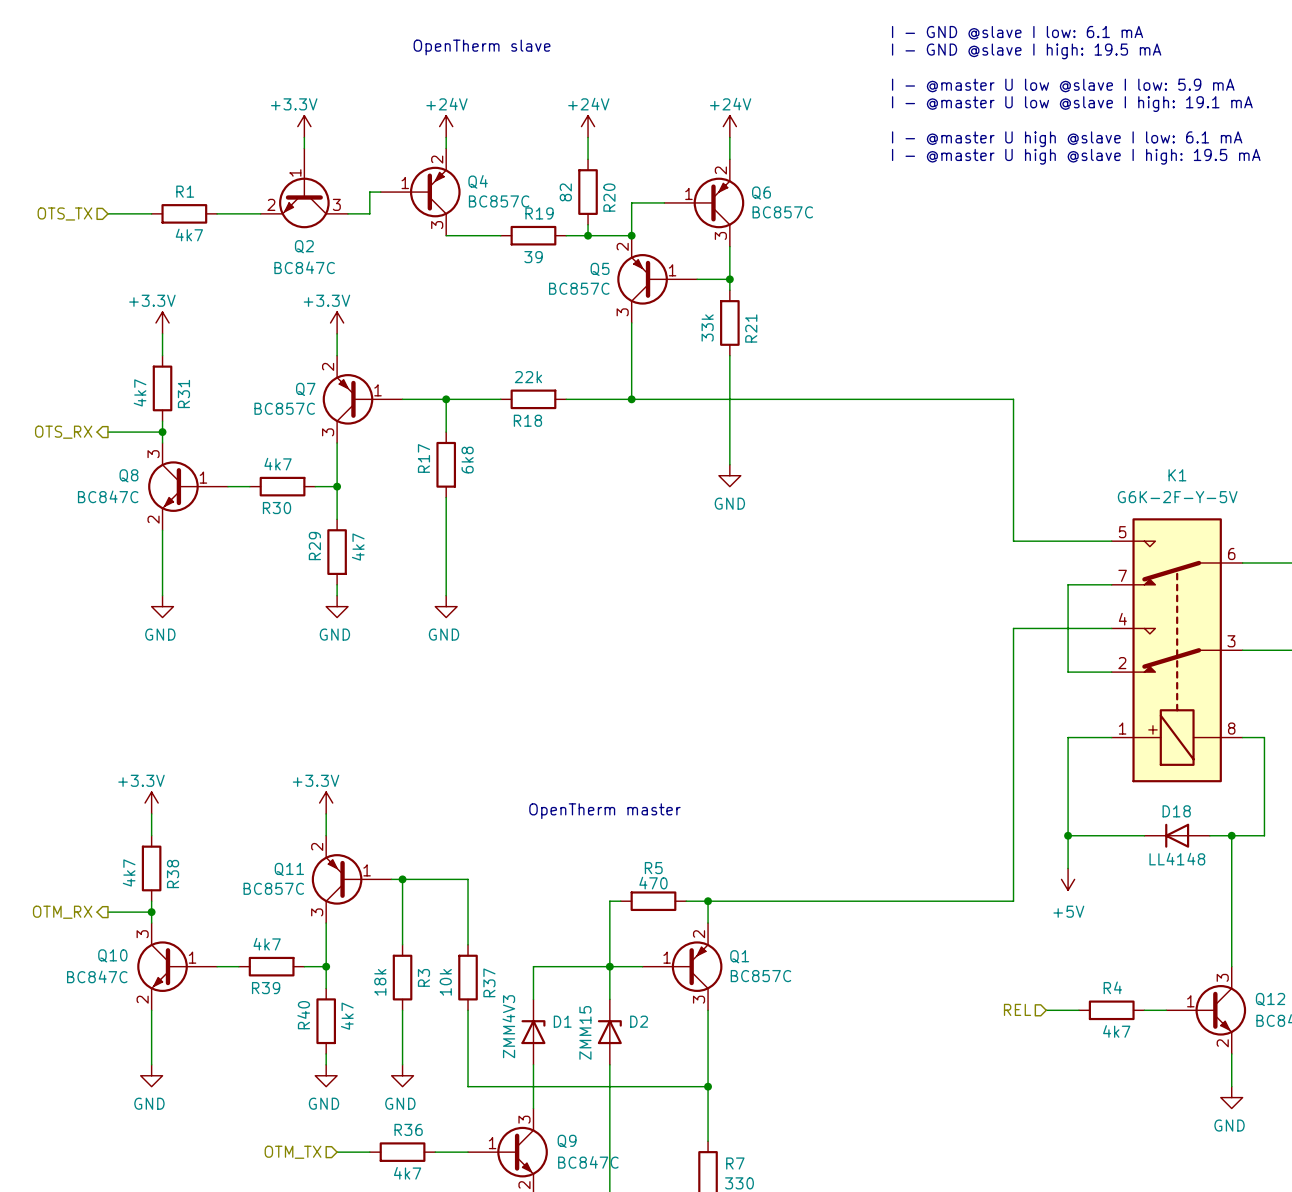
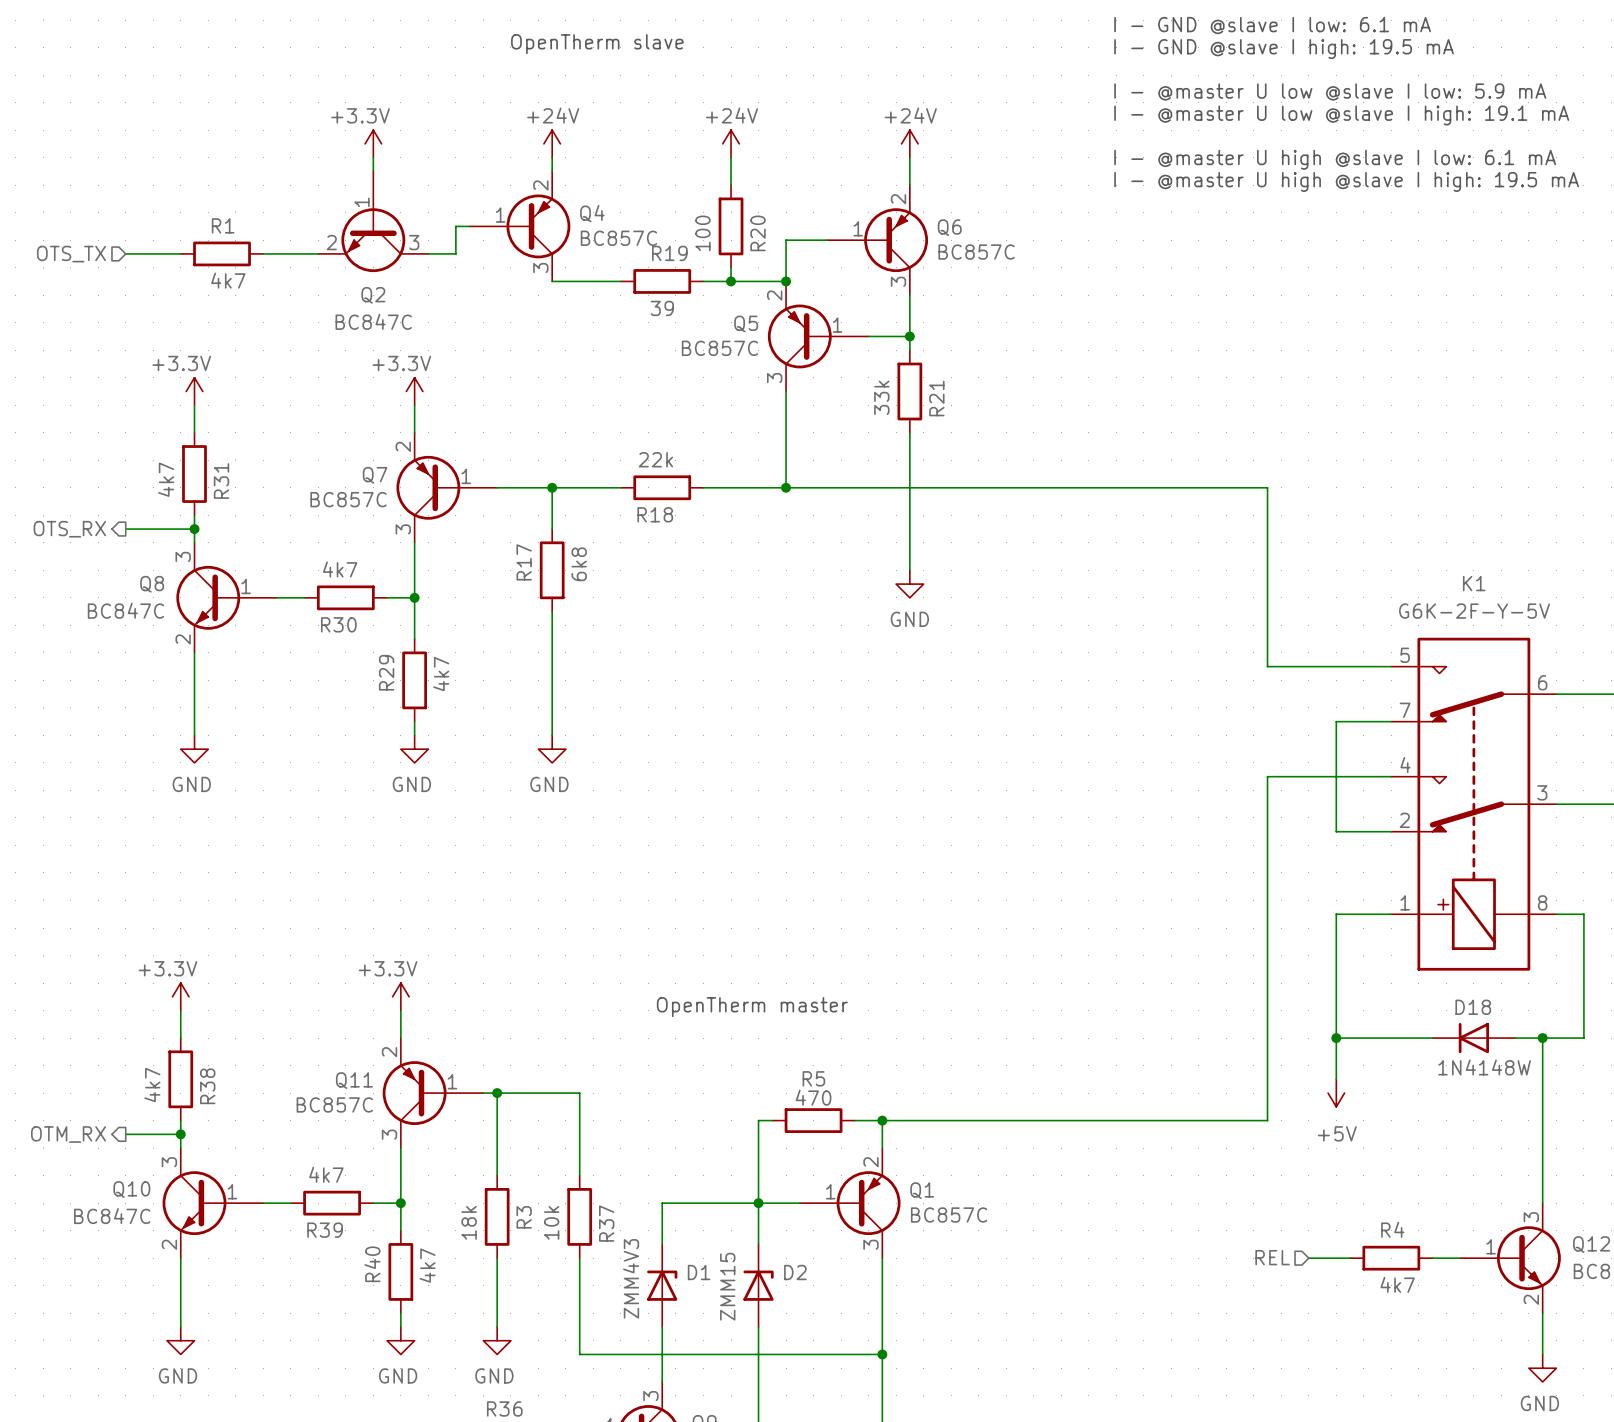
R20 value: 82 (565, 192) -> 100 (702, 233)
D18 value: LL4148 (1177, 859) -> 1N4148W (1484, 1067)

